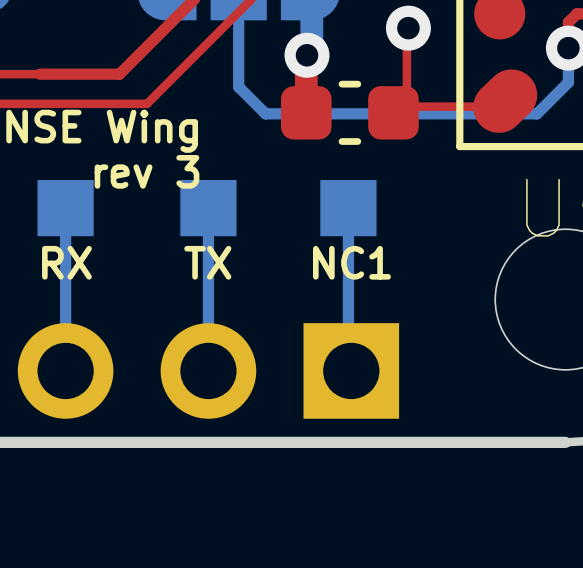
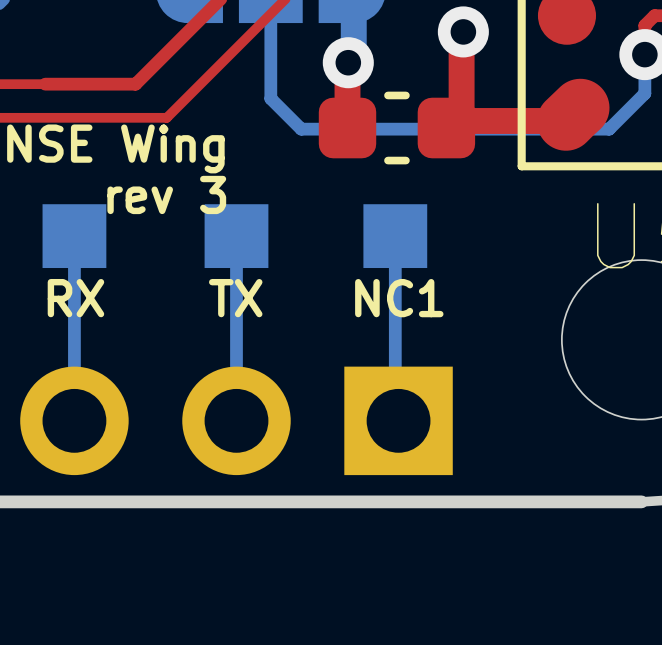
top track width: thin (408, 28) (406, 29) (406, 113) (414, 106) (499, 106) -> thick (463, 31) (461, 33) (461, 129) (469, 120) (566, 120)

